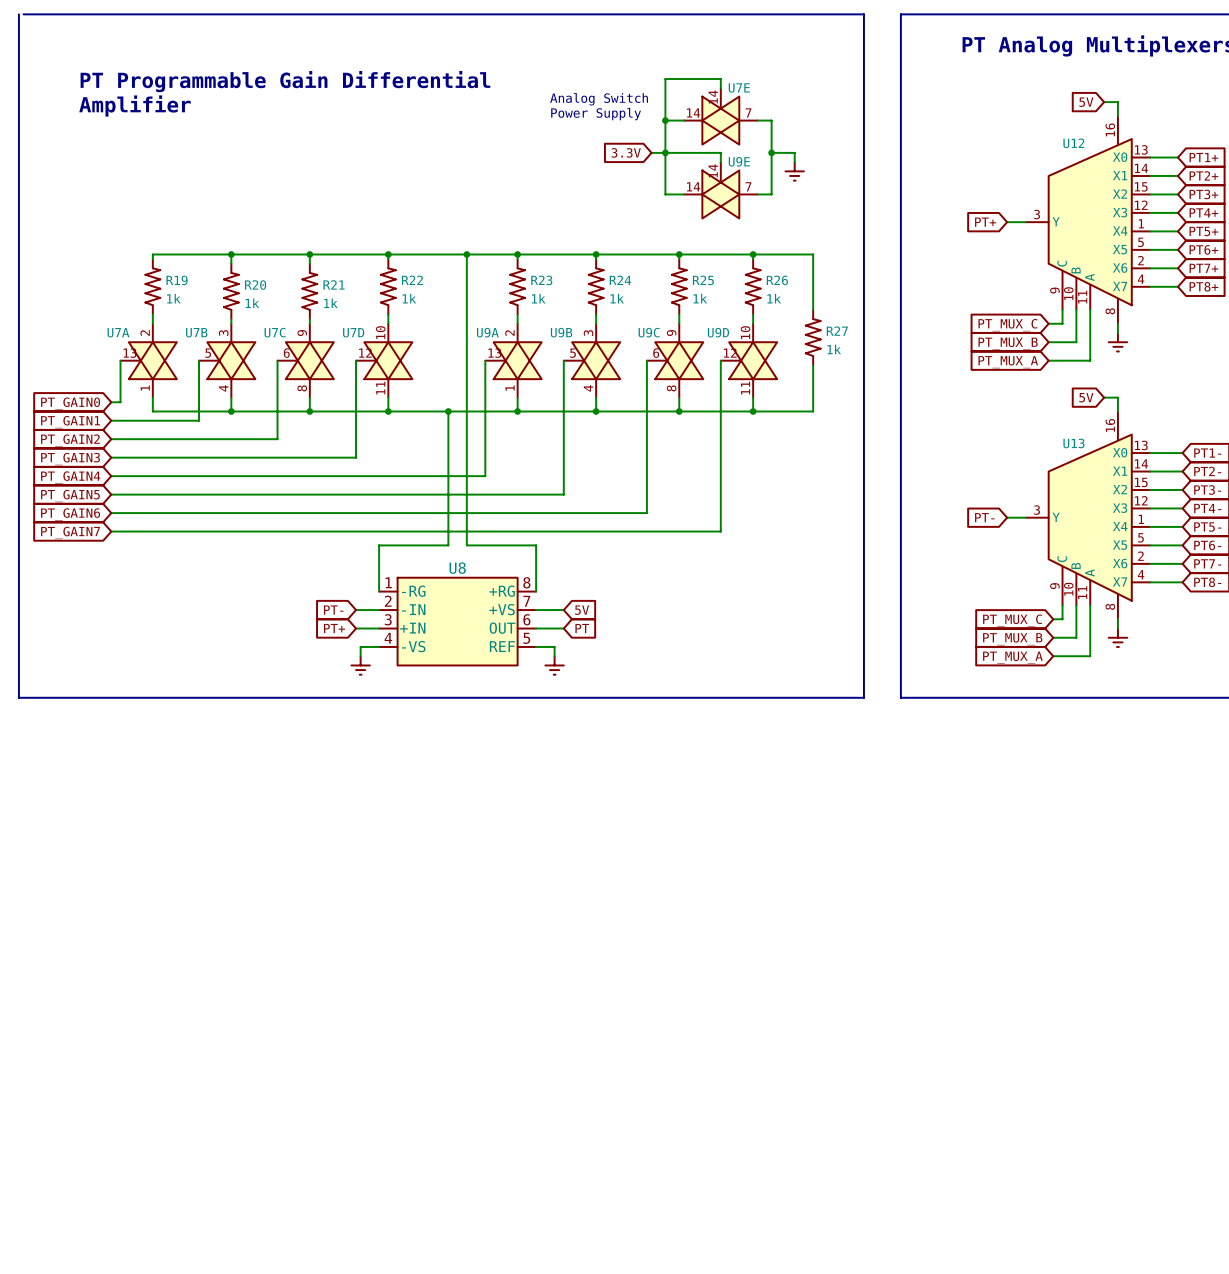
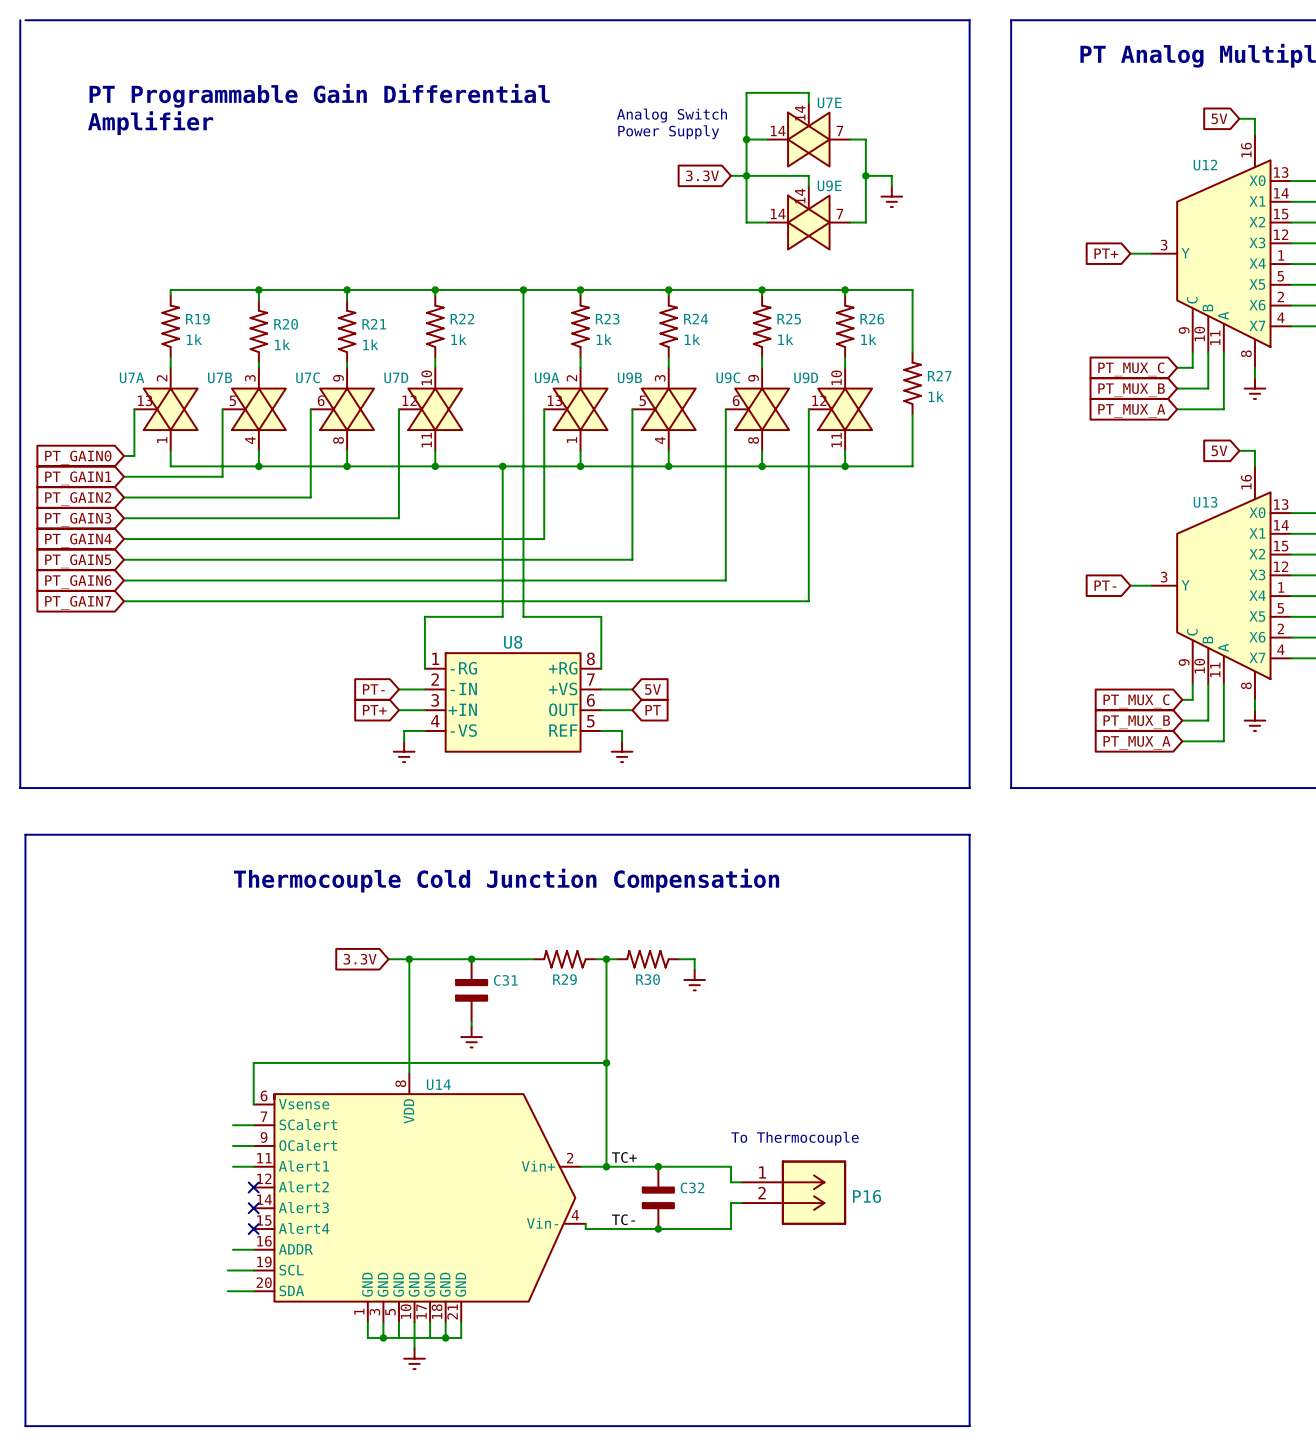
line: none -> (25, 834) (25, 1426) (969, 1426) (969, 834) (25, 834)
text: none -> Thermocouple Cold Junction Compensation (506, 880)
global label: none -> 3.3V (360, 959)
wire: none -> (388, 959) (533, 959)
wire: none -> (409, 959) (409, 1073)
junction: none -> (409, 959)
junction: none -> (471, 959)
R29: none -> (564, 959)
wire: none -> (596, 959) (616, 959)
wire: none -> (606, 959) (606, 1166)
junction: none -> (606, 959)
R30: none -> (647, 959)
wire: none -> (679, 959) (694, 959) (694, 969)
power symbol: none -> (694, 979)
C31: none -> (471, 990)
wire: none -> (471, 1021) (471, 1026)
power symbol: none -> (471, 1037)
wire: none -> (606, 1062) (253, 1062) (253, 1104)
junction: none -> (606, 1062)
wire: none -> (232, 1125) (253, 1125)
text: none -> To Thermocouple (794, 1138)
wire: none -> (232, 1145) (253, 1145)
label: none -> TC+ (624, 1157)
wire: none -> (232, 1166) (253, 1166)
wire: none -> (580, 1166) (730, 1166) (730, 1182) (741, 1182)
junction: none -> (606, 1166)
junction: none -> (658, 1166)
no-connect mark: none -> (253, 1187)
P16: none -> (793, 1192)
U14: none -> (419, 1197)
C32: none -> (658, 1197)
wire: none -> (741, 1203) (730, 1203) (730, 1229) (585, 1229) (585, 1223)
no-connect mark: none -> (253, 1208)
label: none -> TC- (623, 1219)
no-connect mark: none -> (253, 1229)
junction: none -> (658, 1229)
wire: none -> (232, 1249) (253, 1249)
wire: none -> (227, 1270) (253, 1270)
wire: none -> (227, 1291) (253, 1291)
wire: none -> (367, 1322) (367, 1337) (461, 1337) (461, 1322)
wire: none -> (383, 1322) (383, 1337)
wire: none -> (398, 1322) (398, 1337)
wire: none -> (414, 1322) (414, 1348)
wire: none -> (430, 1322) (430, 1337)
wire: none -> (445, 1322) (445, 1337)
junction: none -> (383, 1337)
junction: none -> (445, 1337)
power symbol: none -> (414, 1358)

